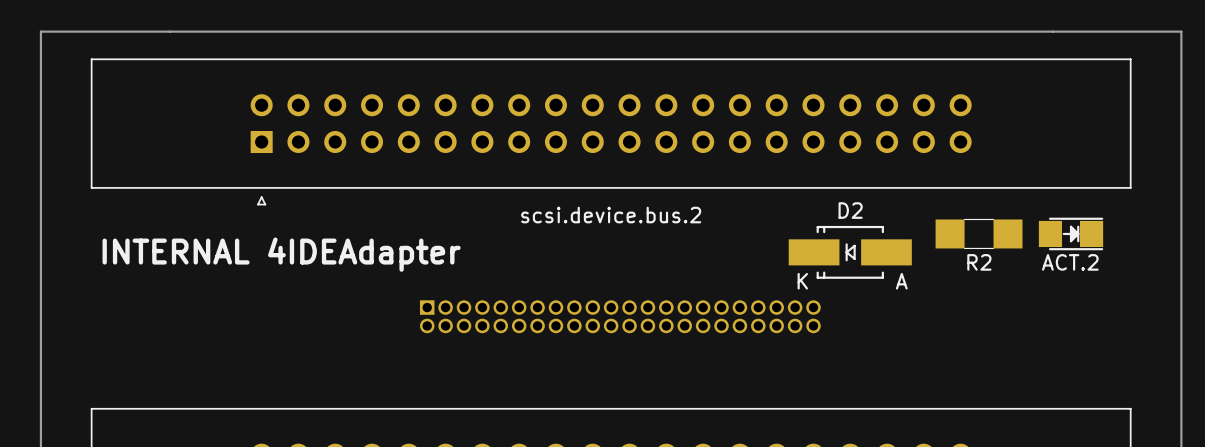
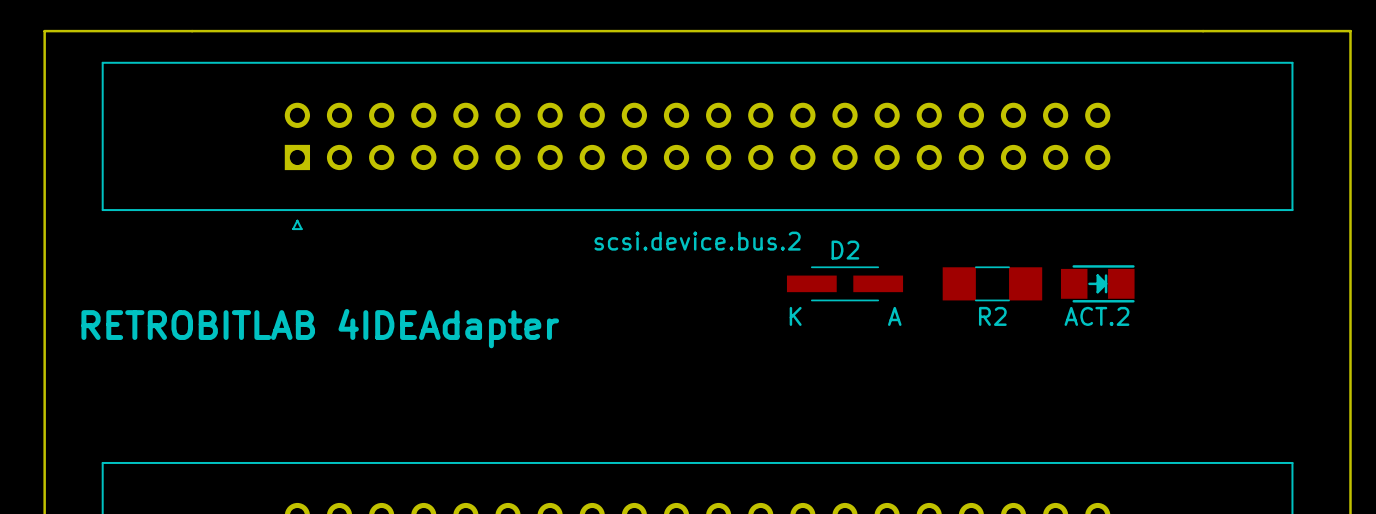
D2 footprint: [788, 225, 912, 279] -> [786, 267, 904, 301]
R2 position: (979, 233) -> (992, 283)
ACT.2 position: (1071, 233) -> (1097, 283)
text: INTERNAL 4IDEAdapter (281, 254) -> RETROBITLAB 4IDEAdapter (320, 328)
part: (620, 316) -> none

